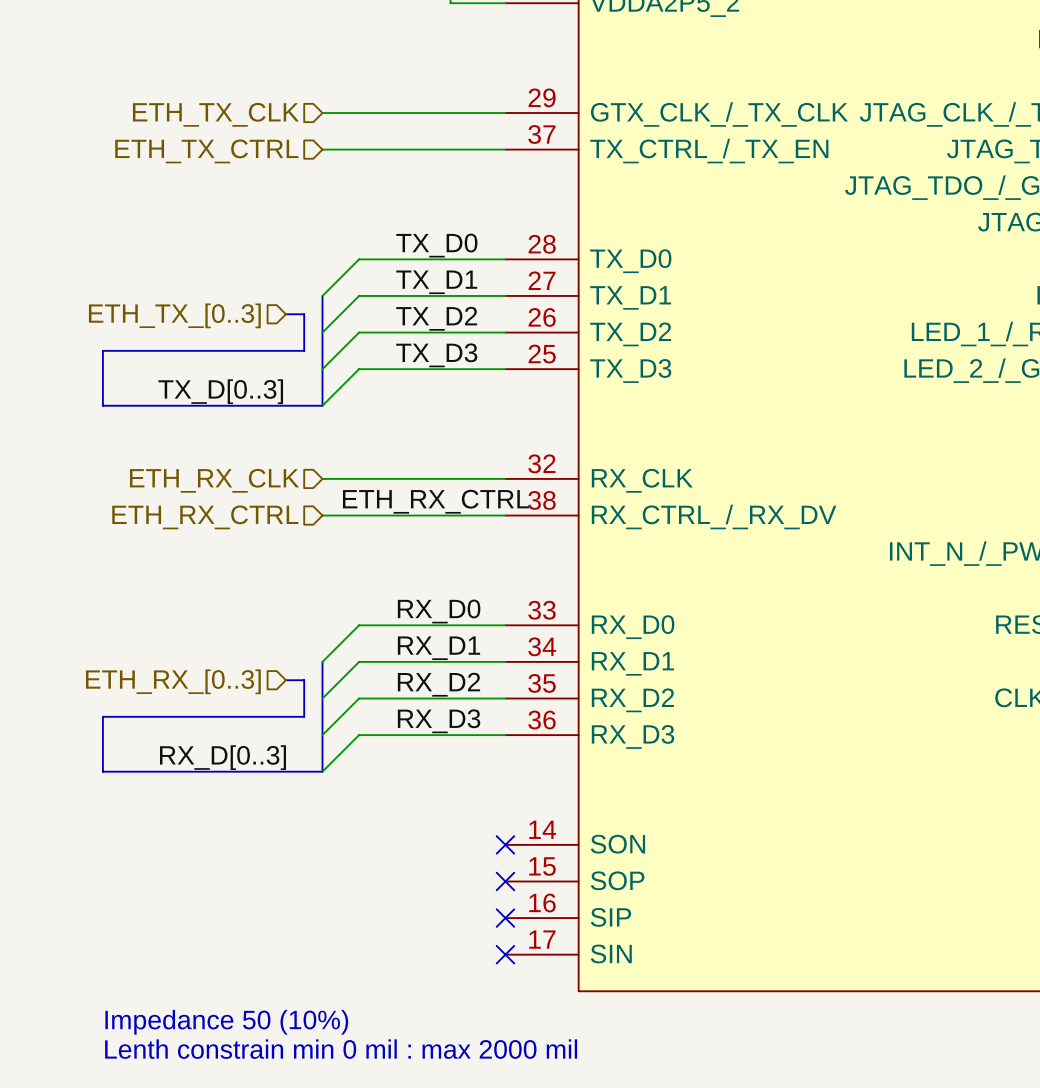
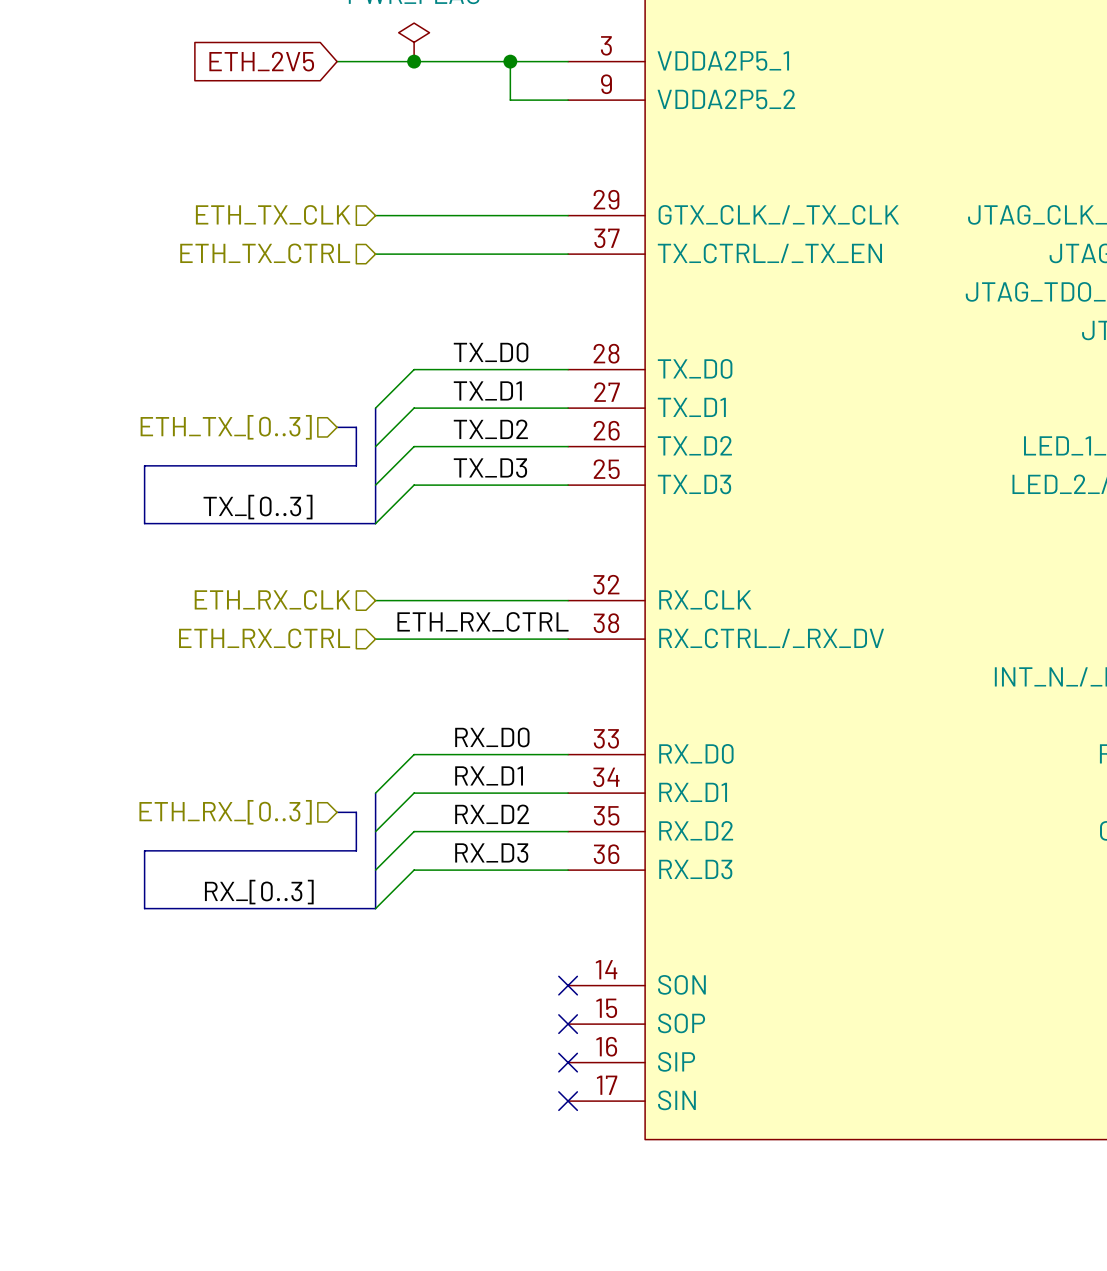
label: TX_D[0..3] (220, 391) -> TX_[0..3] (258, 507)
label: RX_D[0..3] (223, 757) -> RX_[0..3] (259, 892)
text: Impedance 50 (10%) (226, 1022) -> none
text: Lenth constrain min 0 mil : max 2000 mil (341, 1049) -> none

